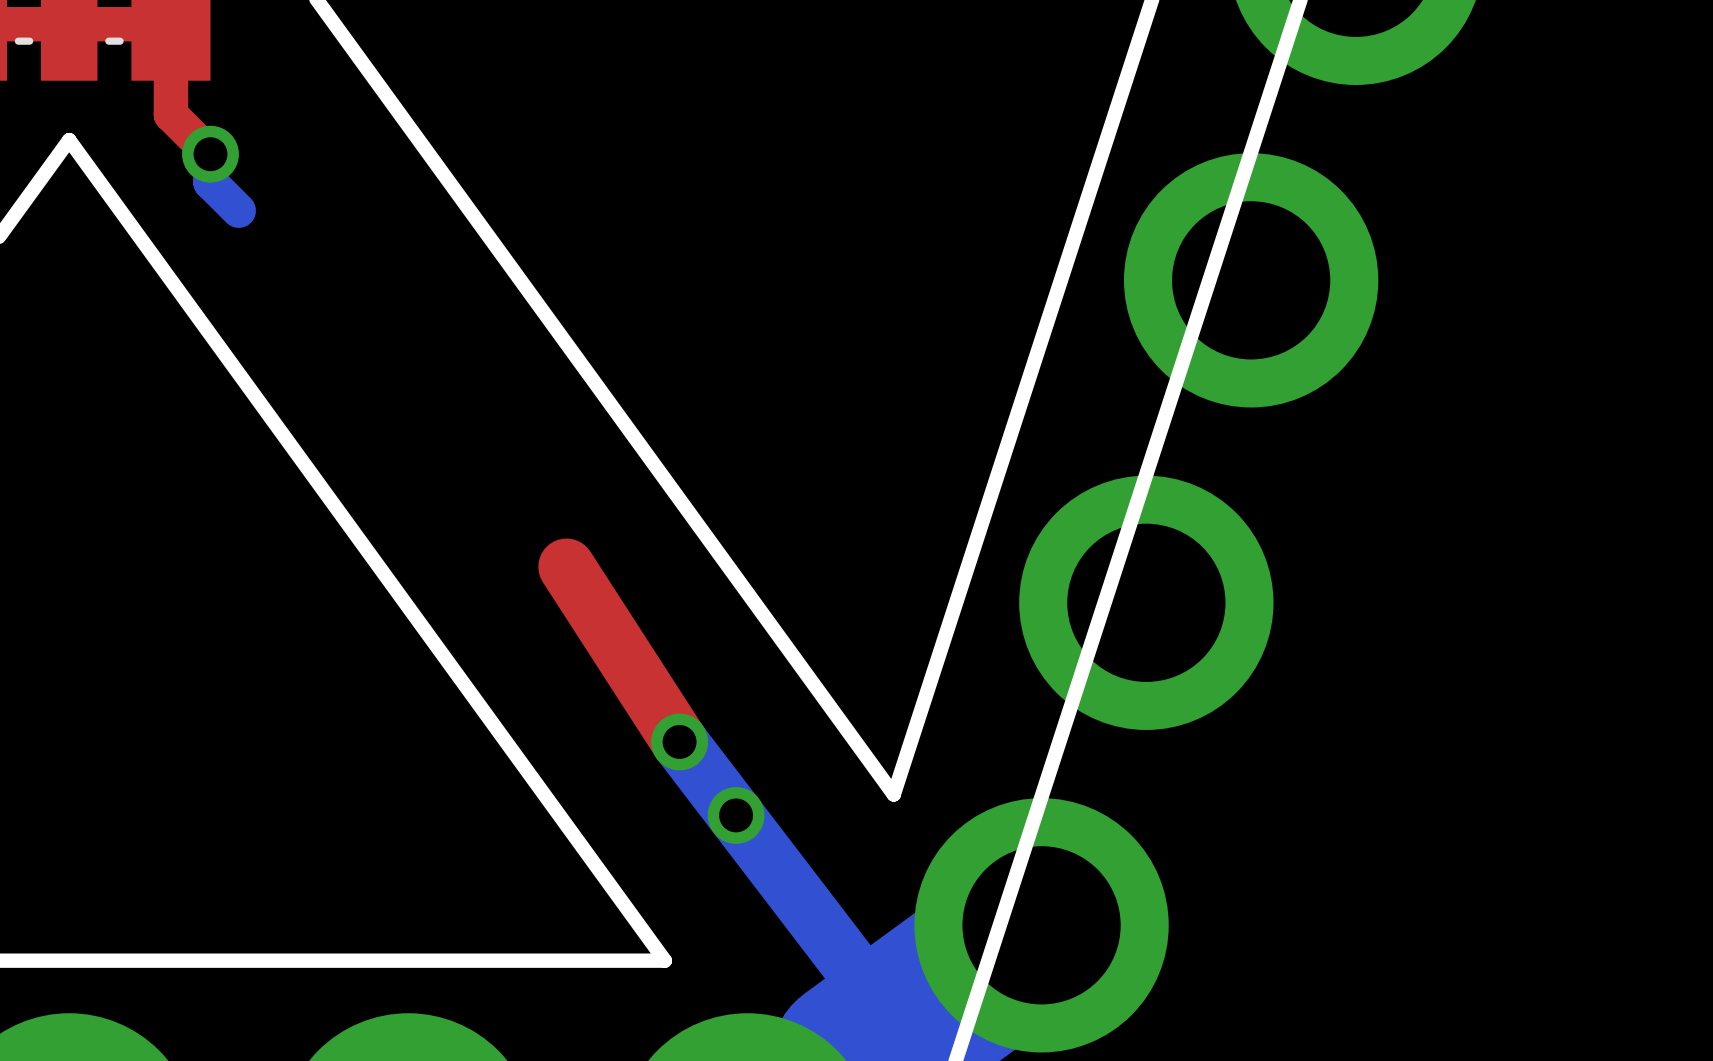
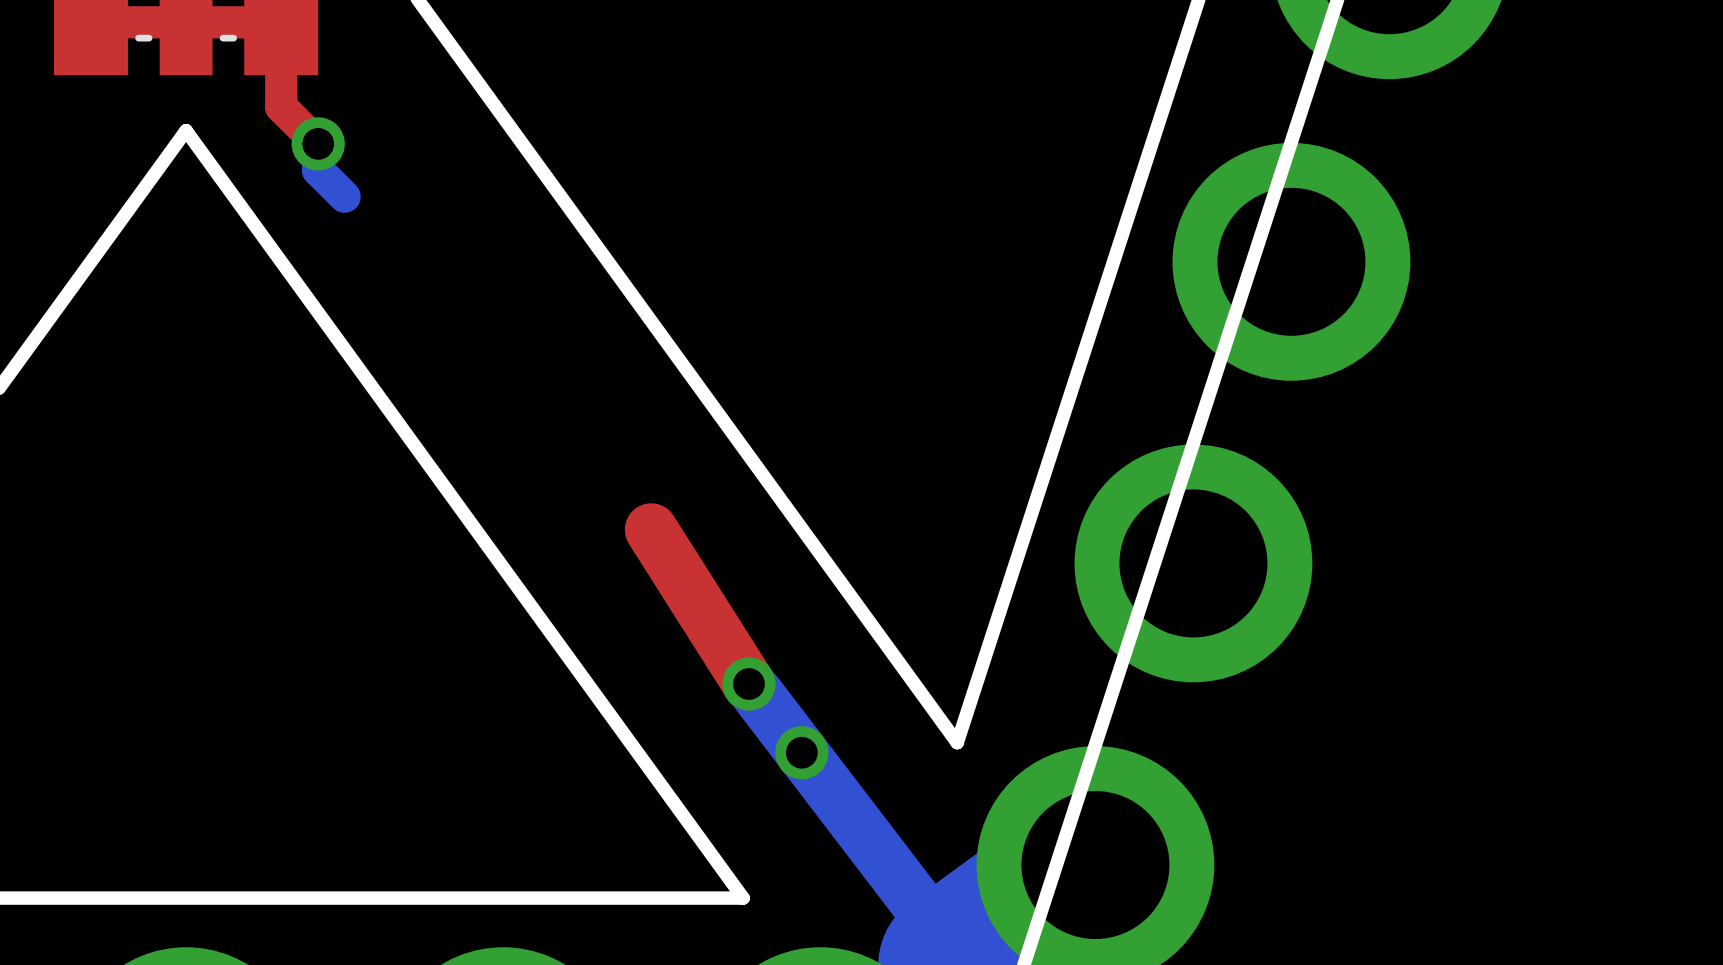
top track: (566, 566) (679, 741) -> (651, 529) (748, 684)
via position: (679, 741) -> (748, 684)
via position: (736, 815) -> (801, 752)

